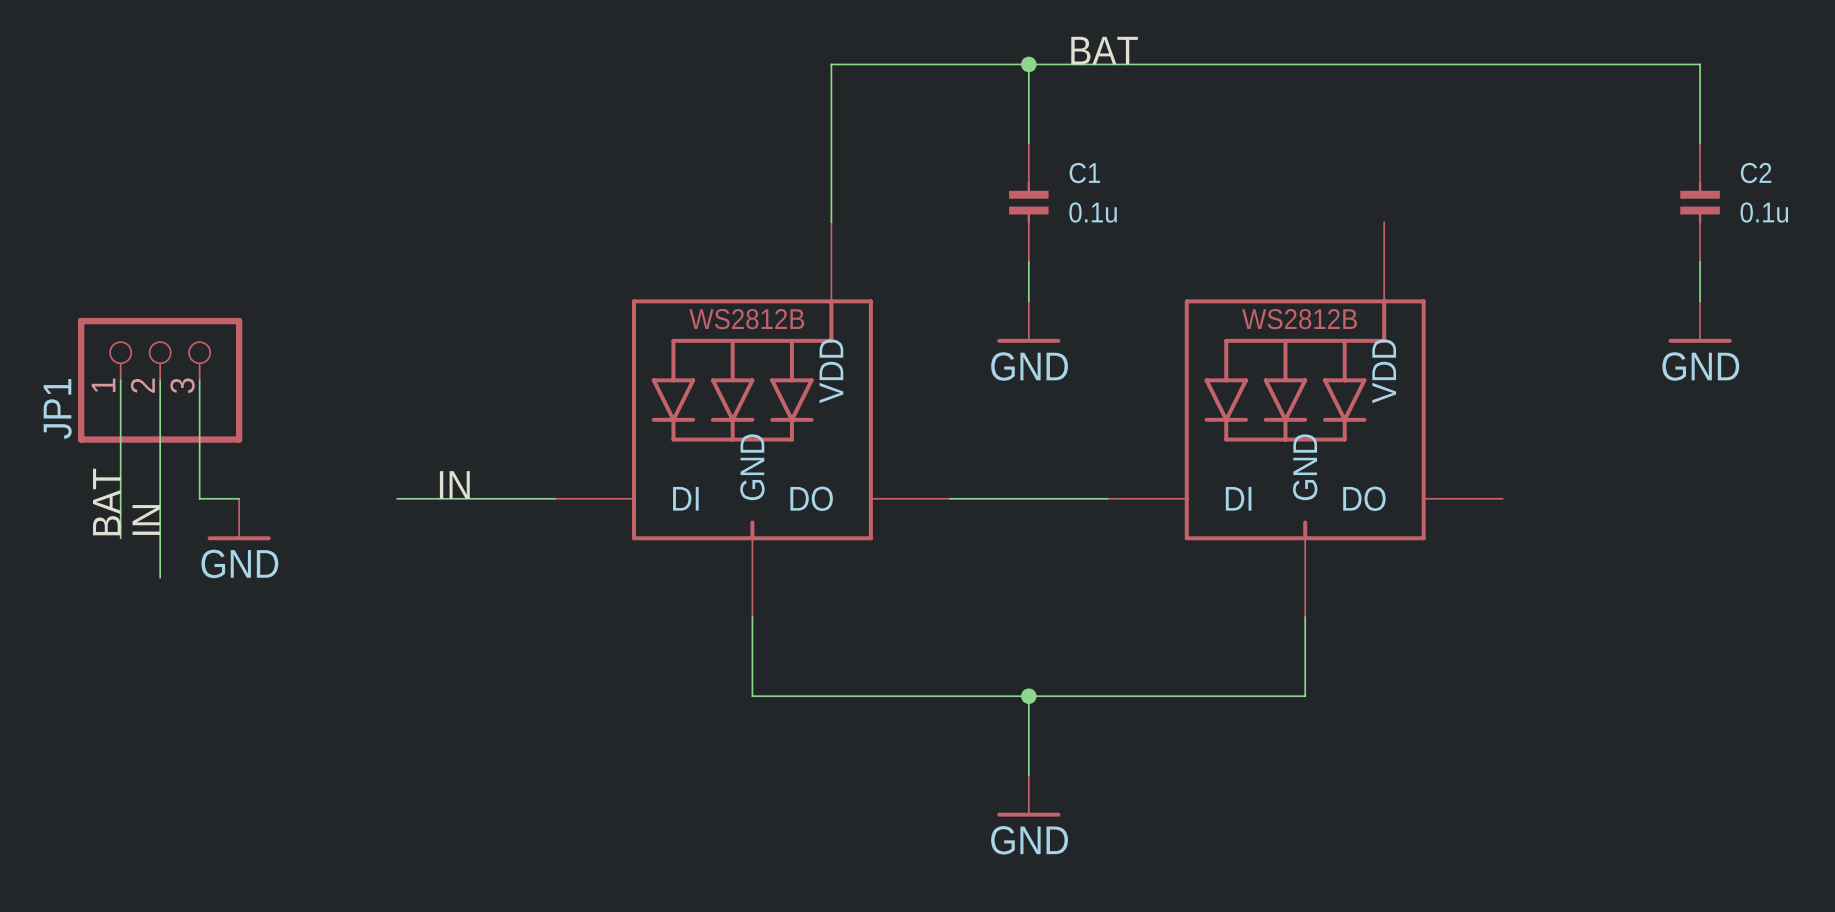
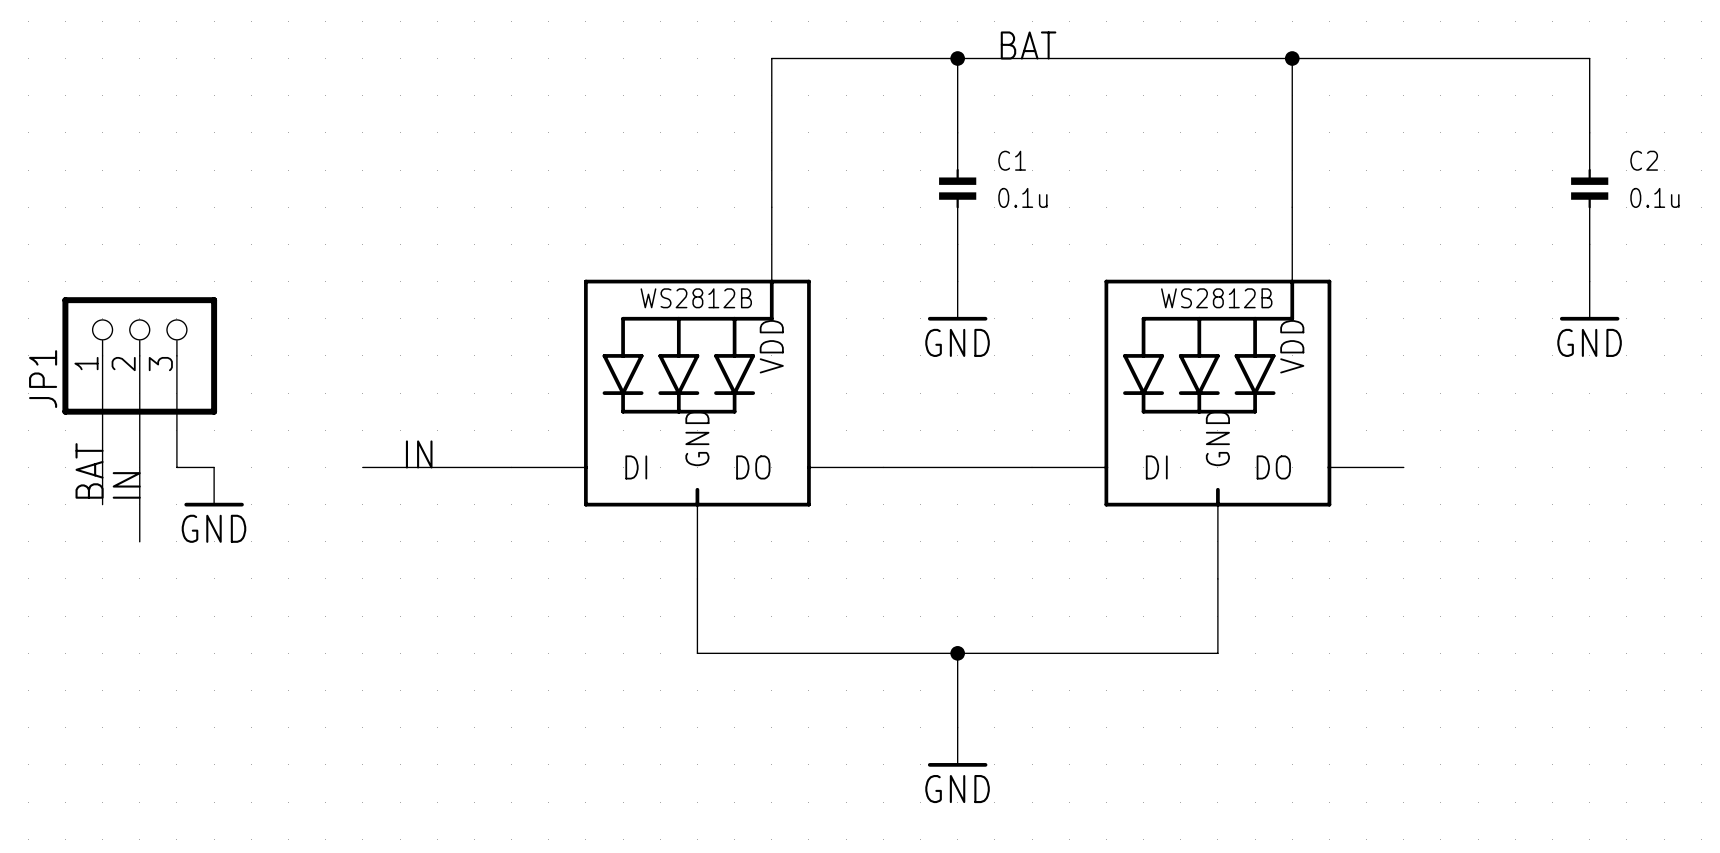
wire: none -> (1292, 58) (1292, 207)
junction: none -> (1292, 58)

